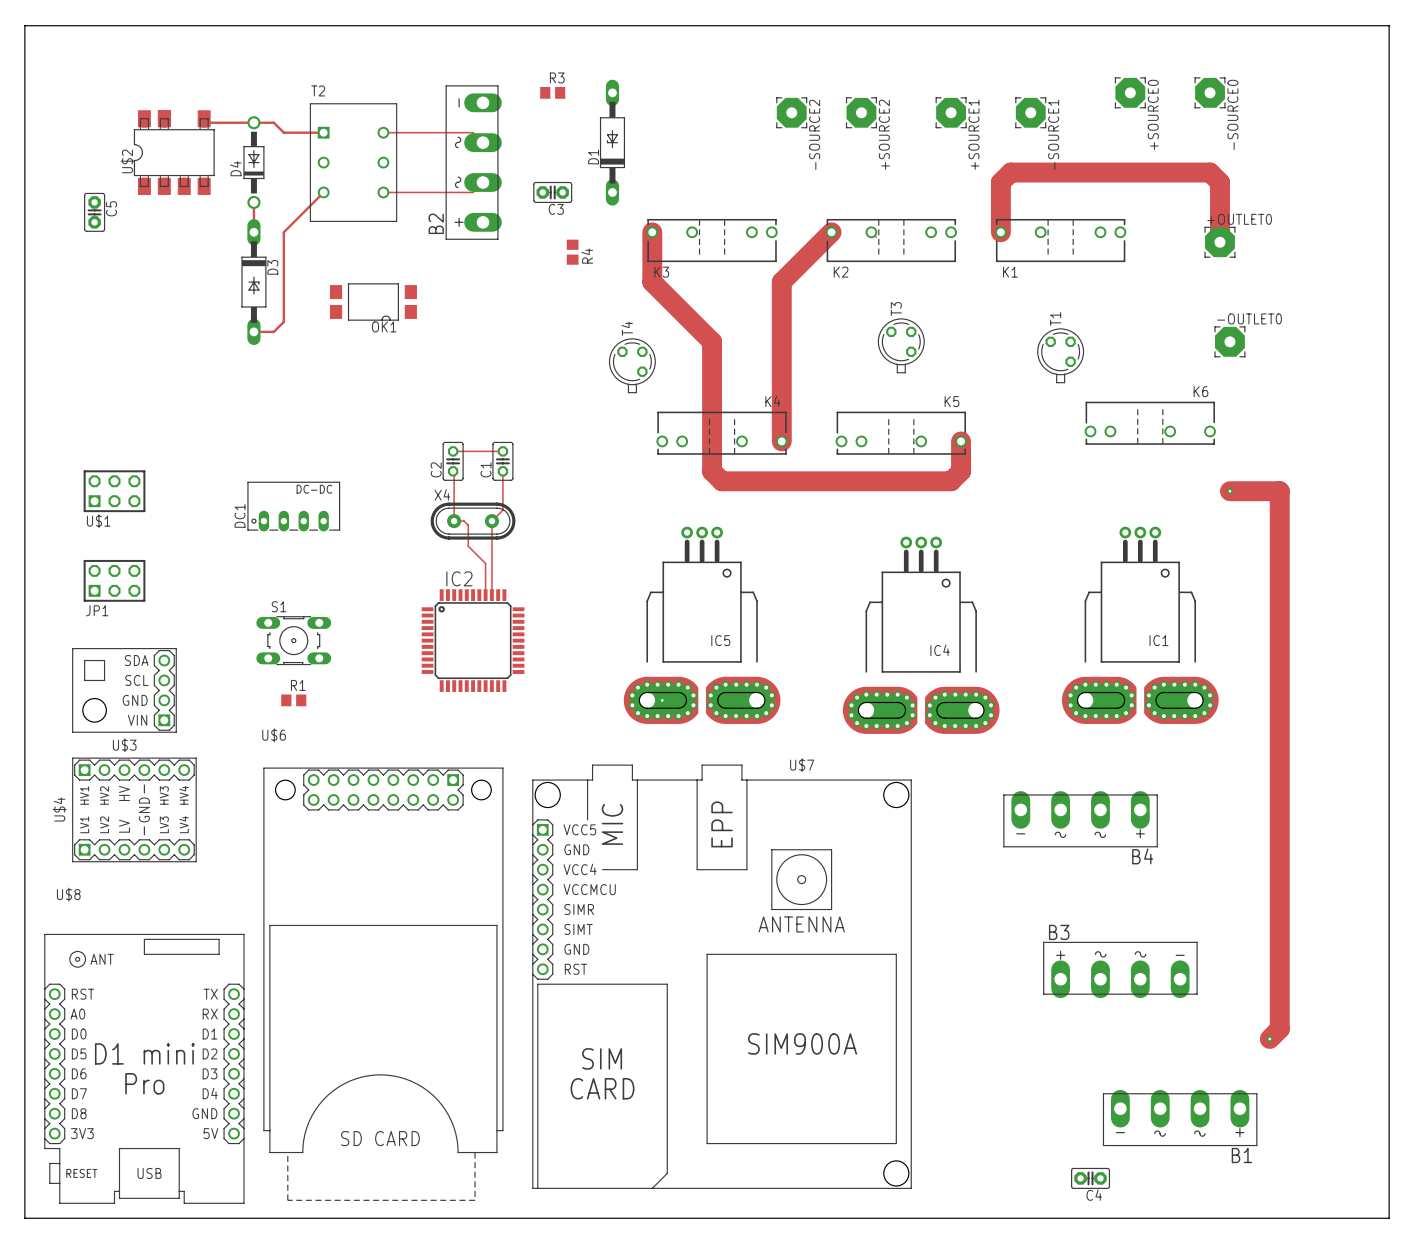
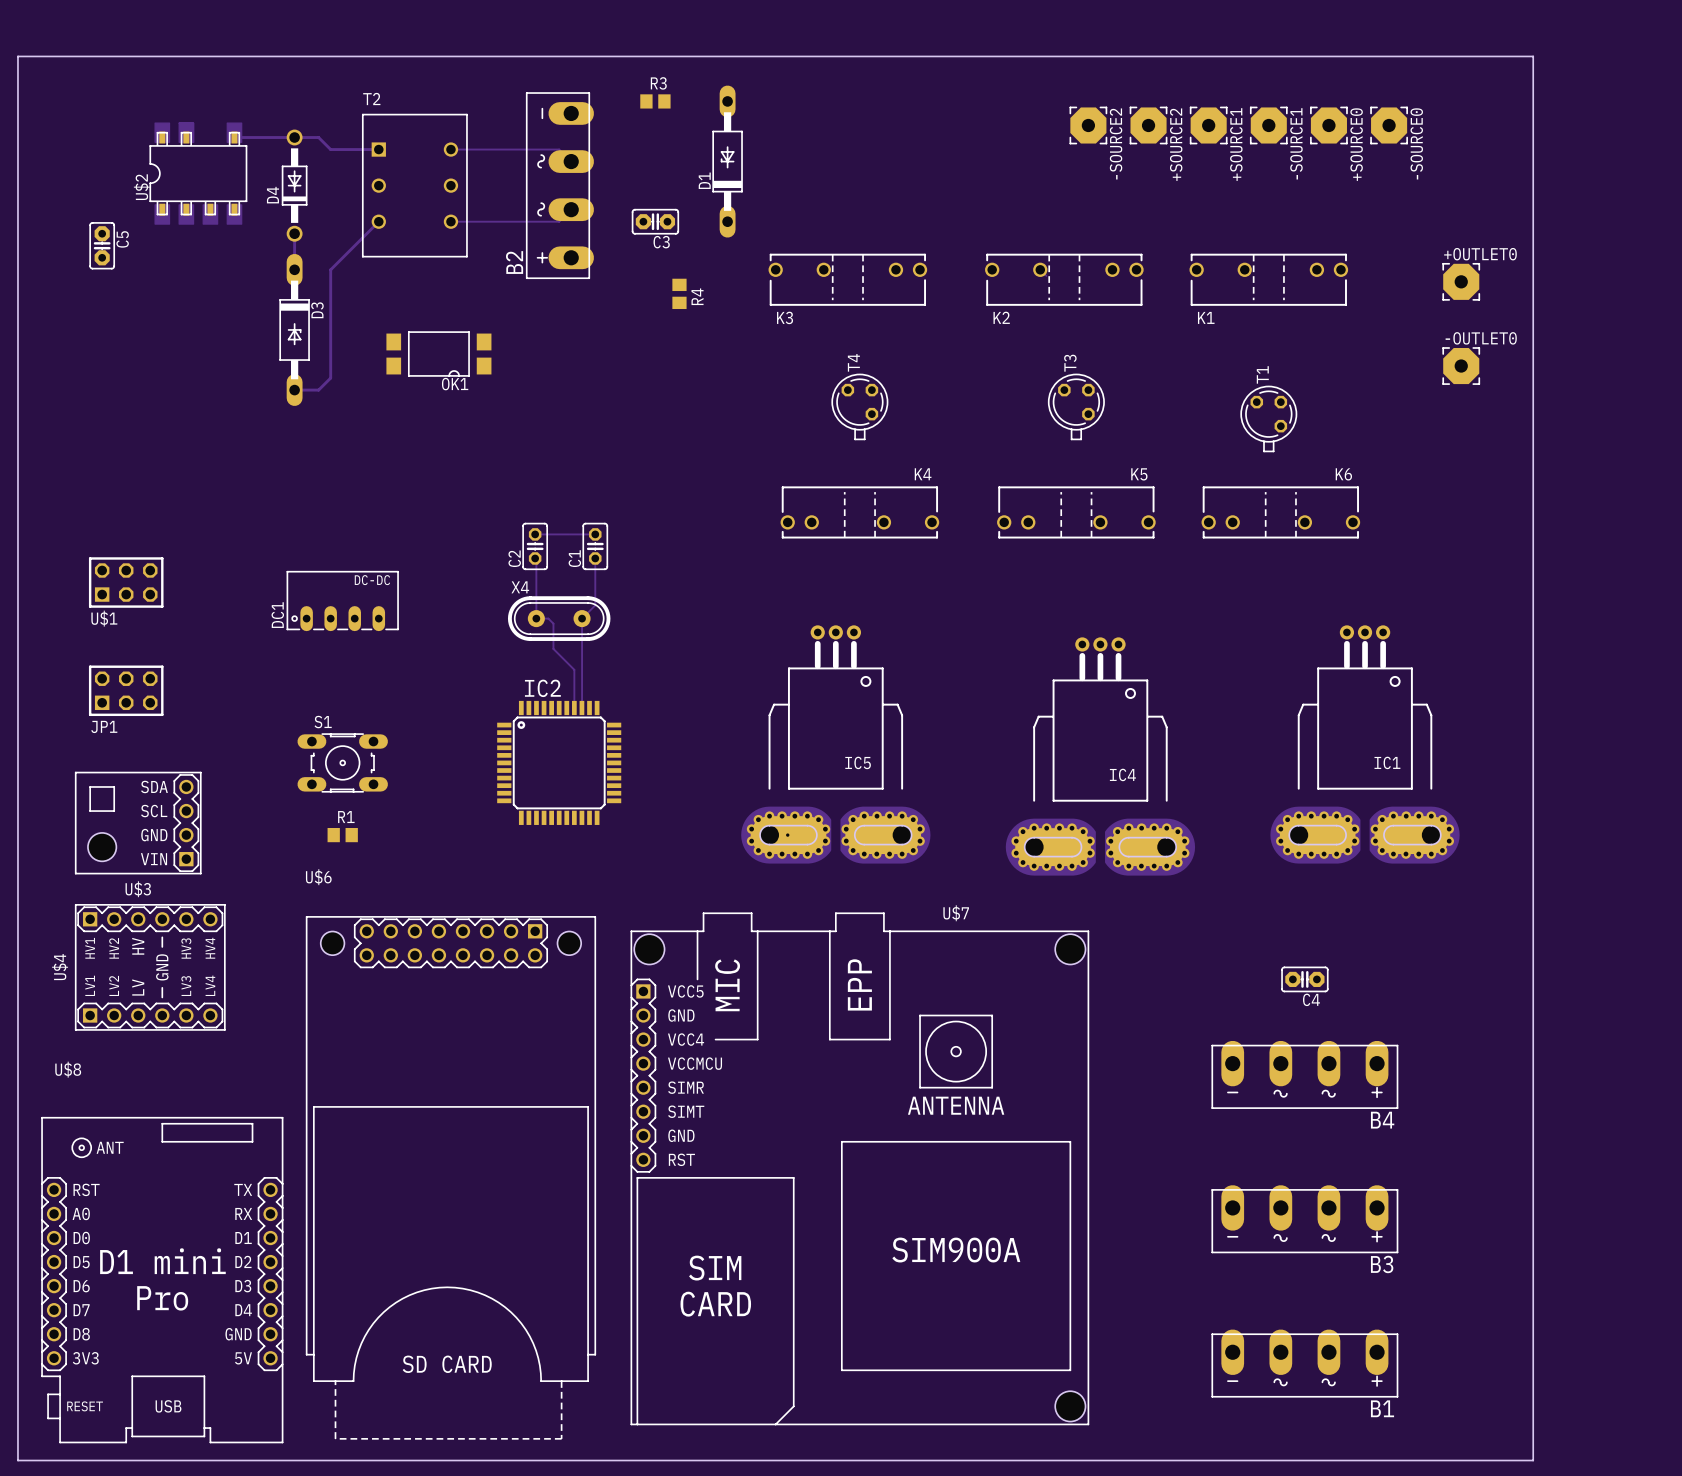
board edge: (24, 55) (24, 25) (1389, 25) (1389, 1218) (1279, 1218) -> (17, 56) (1533, 56) (1533, 1460)
+SOURCE0 position: (1130, 92) -> (1328, 125)
-SOURCE0 position: (1210, 92) -> (1389, 125)
-SOURCE2 position: (791, 112) -> (1088, 125)
+SOURCE2 position: (861, 112) -> (1148, 125)
+SOURCE1 position: (951, 112) -> (1208, 125)
-SOURCE1 position: (1030, 112) -> (1268, 125)
track: (652, 232) (652, 282) (712, 341) (712, 471) (722, 481) (951, 481) (961, 471) (961, 441) -> none
track: (831, 232) (781, 282) (781, 441) -> none
track: (1000, 232) (1000, 182) (1010, 172) (1210, 172) (1219, 182) (1219, 242) -> none
-OUTLET0 position: (1229, 341) -> (1461, 366)
T4 position: (632, 365) -> (859, 406)
K6 position: (1150, 423) -> (1280, 512)
track: (1229, 491) (1279, 491) (1279, 1029) (1269, 1038) -> none
via: (1229, 491) -> none
B4 position: (1080, 819) -> (1304, 1074)
B3 rotation: 0° (1120, 969) -> 180° (1304, 1219)
via: (1269, 1038) -> none
B1 position: (1180, 1118) -> (1304, 1363)
C4 position: (1090, 1178) -> (1304, 979)

